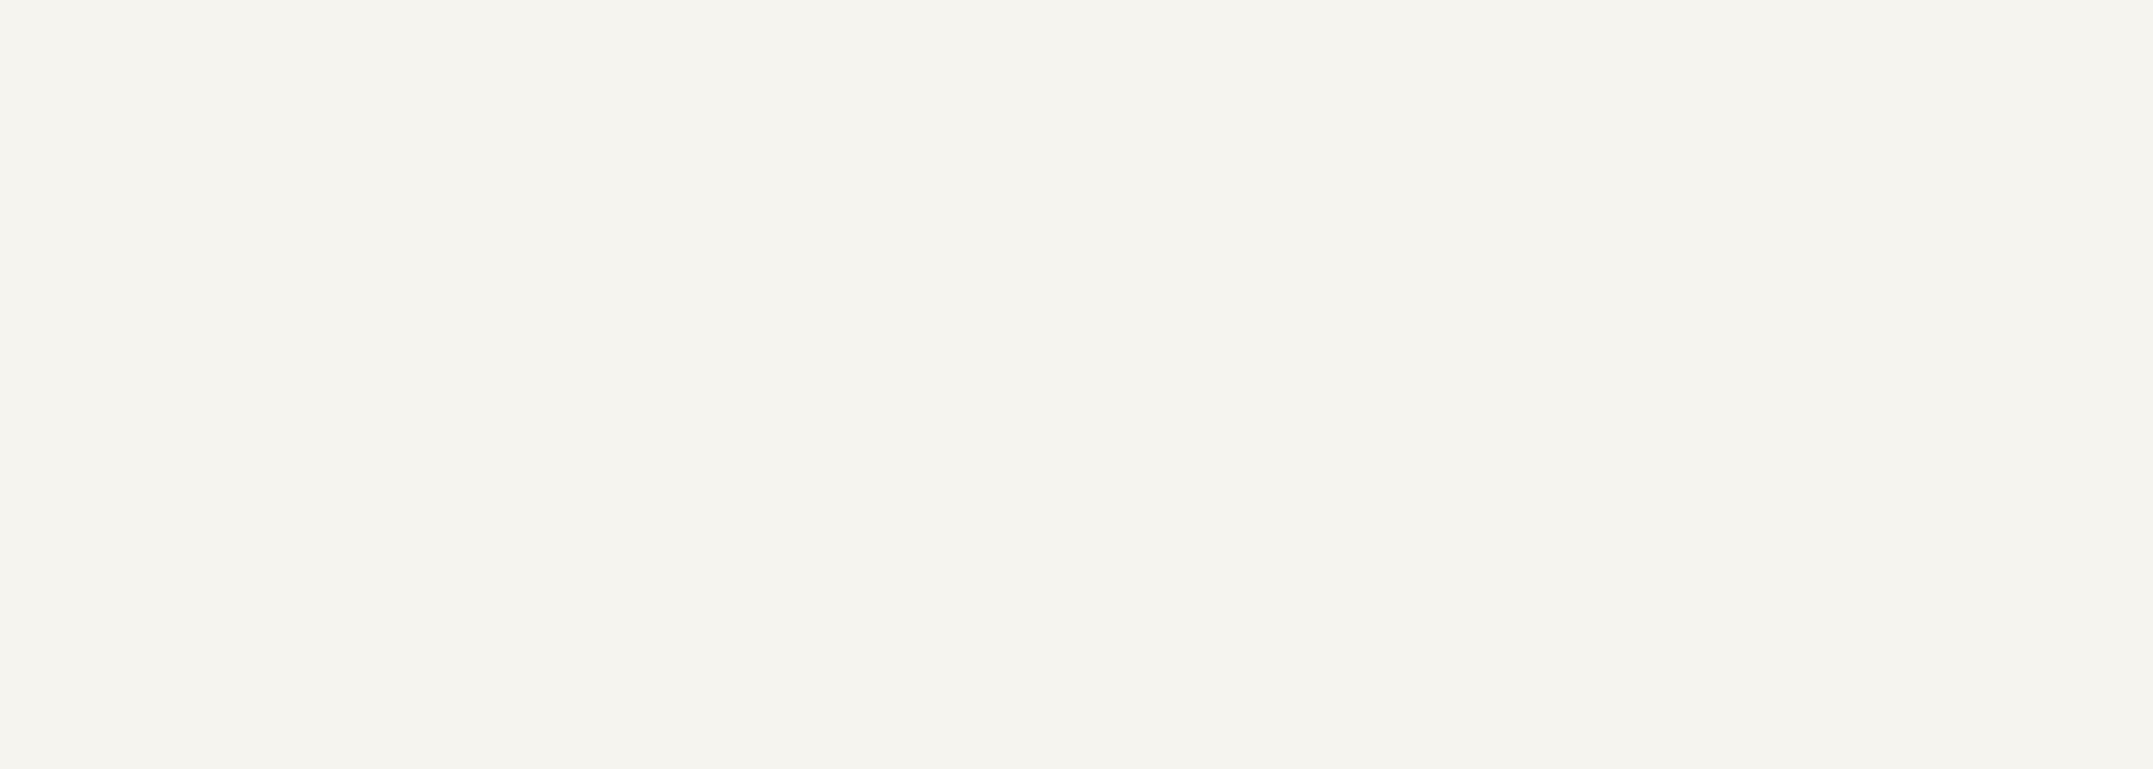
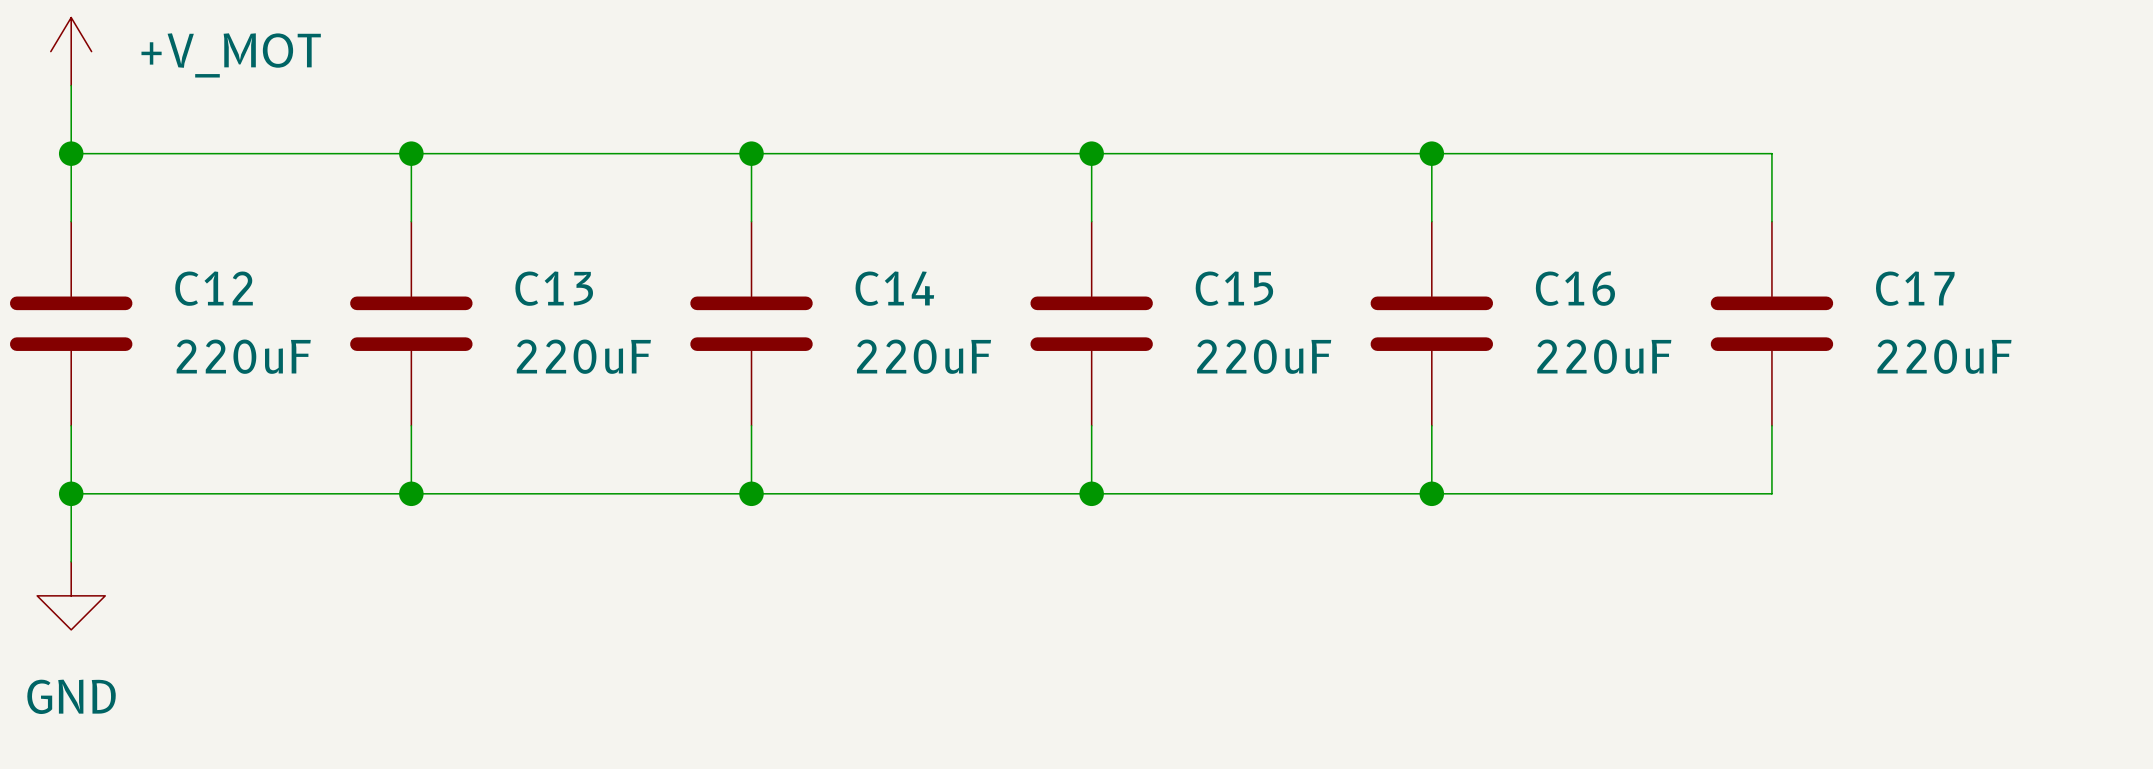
power symbol: none -> +V_MOT (71, 51)
wire: none -> (71, 85) (71, 221)
wire: none -> (71, 153) (1771, 153) (1771, 221)
junction: none -> (71, 153)
wire: none -> (411, 153) (411, 221)
junction: none -> (411, 153)
wire: none -> (751, 153) (751, 221)
junction: none -> (751, 153)
wire: none -> (1091, 153) (1091, 221)
junction: none -> (1091, 153)
wire: none -> (1431, 153) (1431, 221)
junction: none -> (1431, 153)
C12: none -> 220uF (71, 323)
C13: none -> 220uF (411, 323)
C14: none -> 220uF (751, 323)
C15: none -> 220uF (1091, 323)
C16: none -> 220uF (1431, 323)
C17: none -> 220uF (1771, 323)
wire: none -> (71, 425) (71, 561)
wire: none -> (411, 425) (411, 493)
wire: none -> (751, 425) (751, 493)
wire: none -> (1091, 425) (1091, 493)
wire: none -> (1431, 425) (1431, 493)
wire: none -> (1771, 425) (1771, 493) (71, 493)
junction: none -> (71, 493)
junction: none -> (411, 493)
junction: none -> (751, 493)
junction: none -> (1091, 493)
junction: none -> (1431, 493)
power symbol: none -> GND (71, 595)

